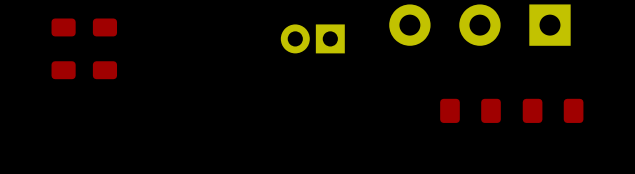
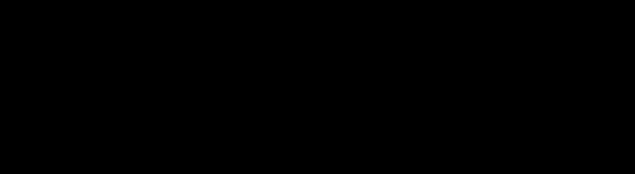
part: (479, 25) -> none
part: (312, 38) -> none
part: (63, 48) -> none
part: (104, 48) -> none
part: (470, 110) -> none
part: (553, 110) -> none

